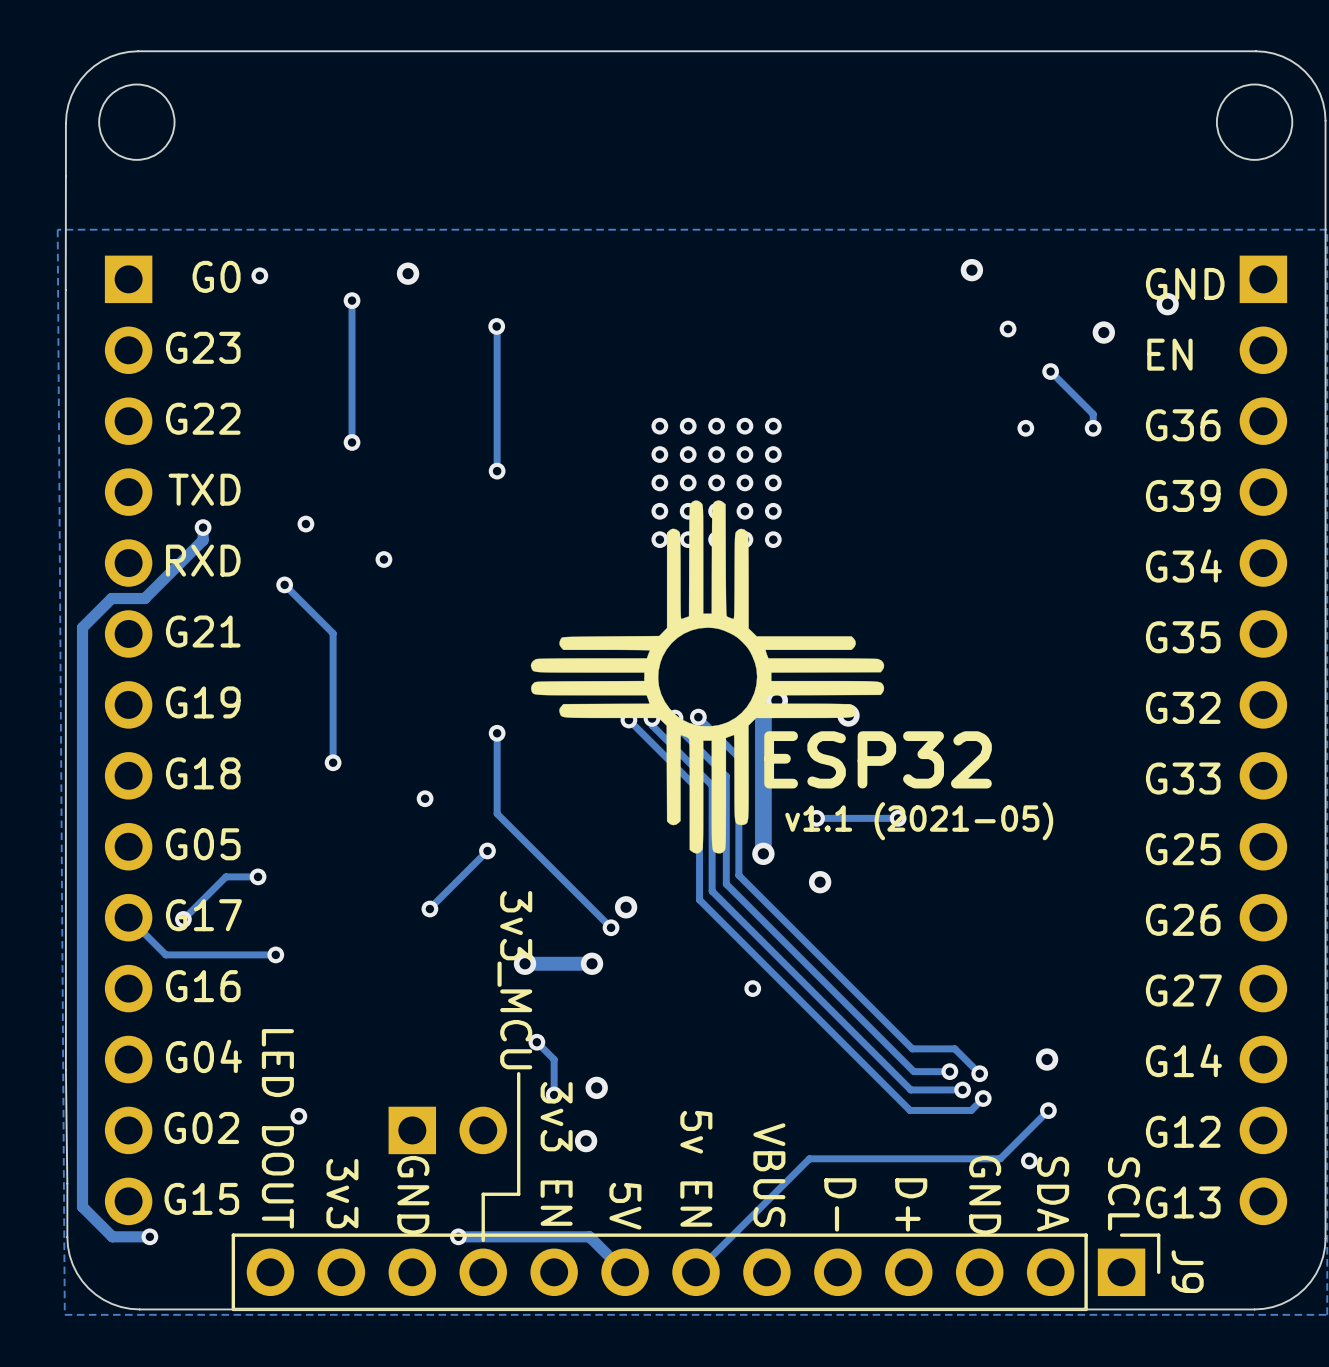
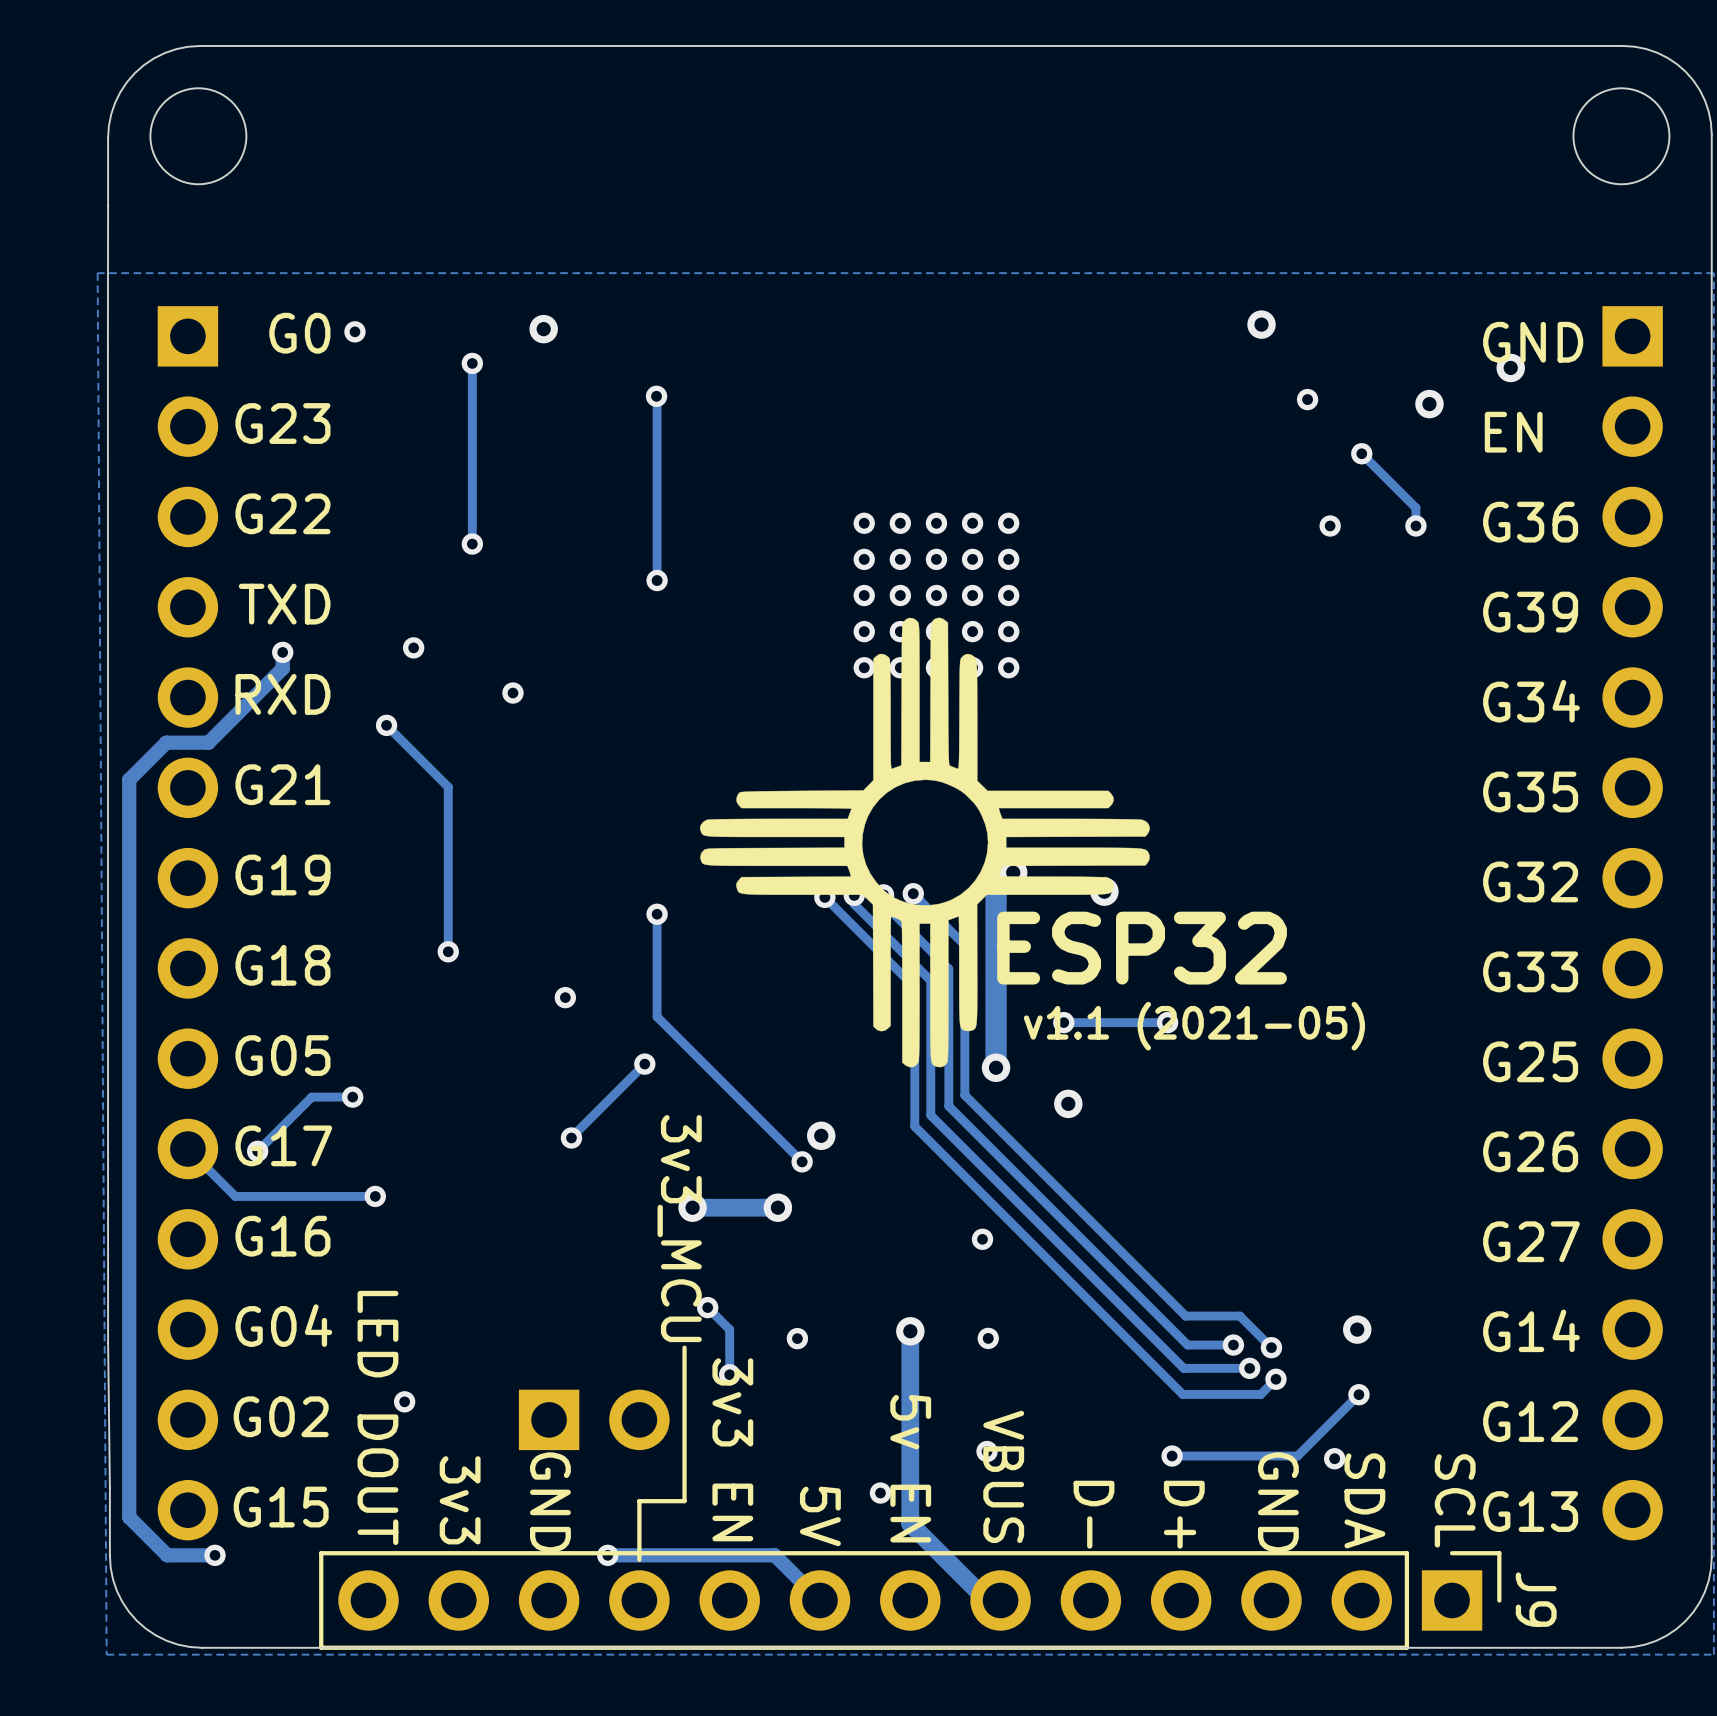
track: none -> (910, 1331) (910, 1523) (987, 1600)
via: none -> (910, 1331)
via: none -> (797, 1338)
via: none -> (988, 1338)
via: (596, 1087) -> none
via: (586, 1141) -> none
via: none -> (987, 1451)
track: (901, 1158) (809, 1158) (696, 1272) -> none
via: none -> (1172, 1456)
via: none -> (880, 1493)

